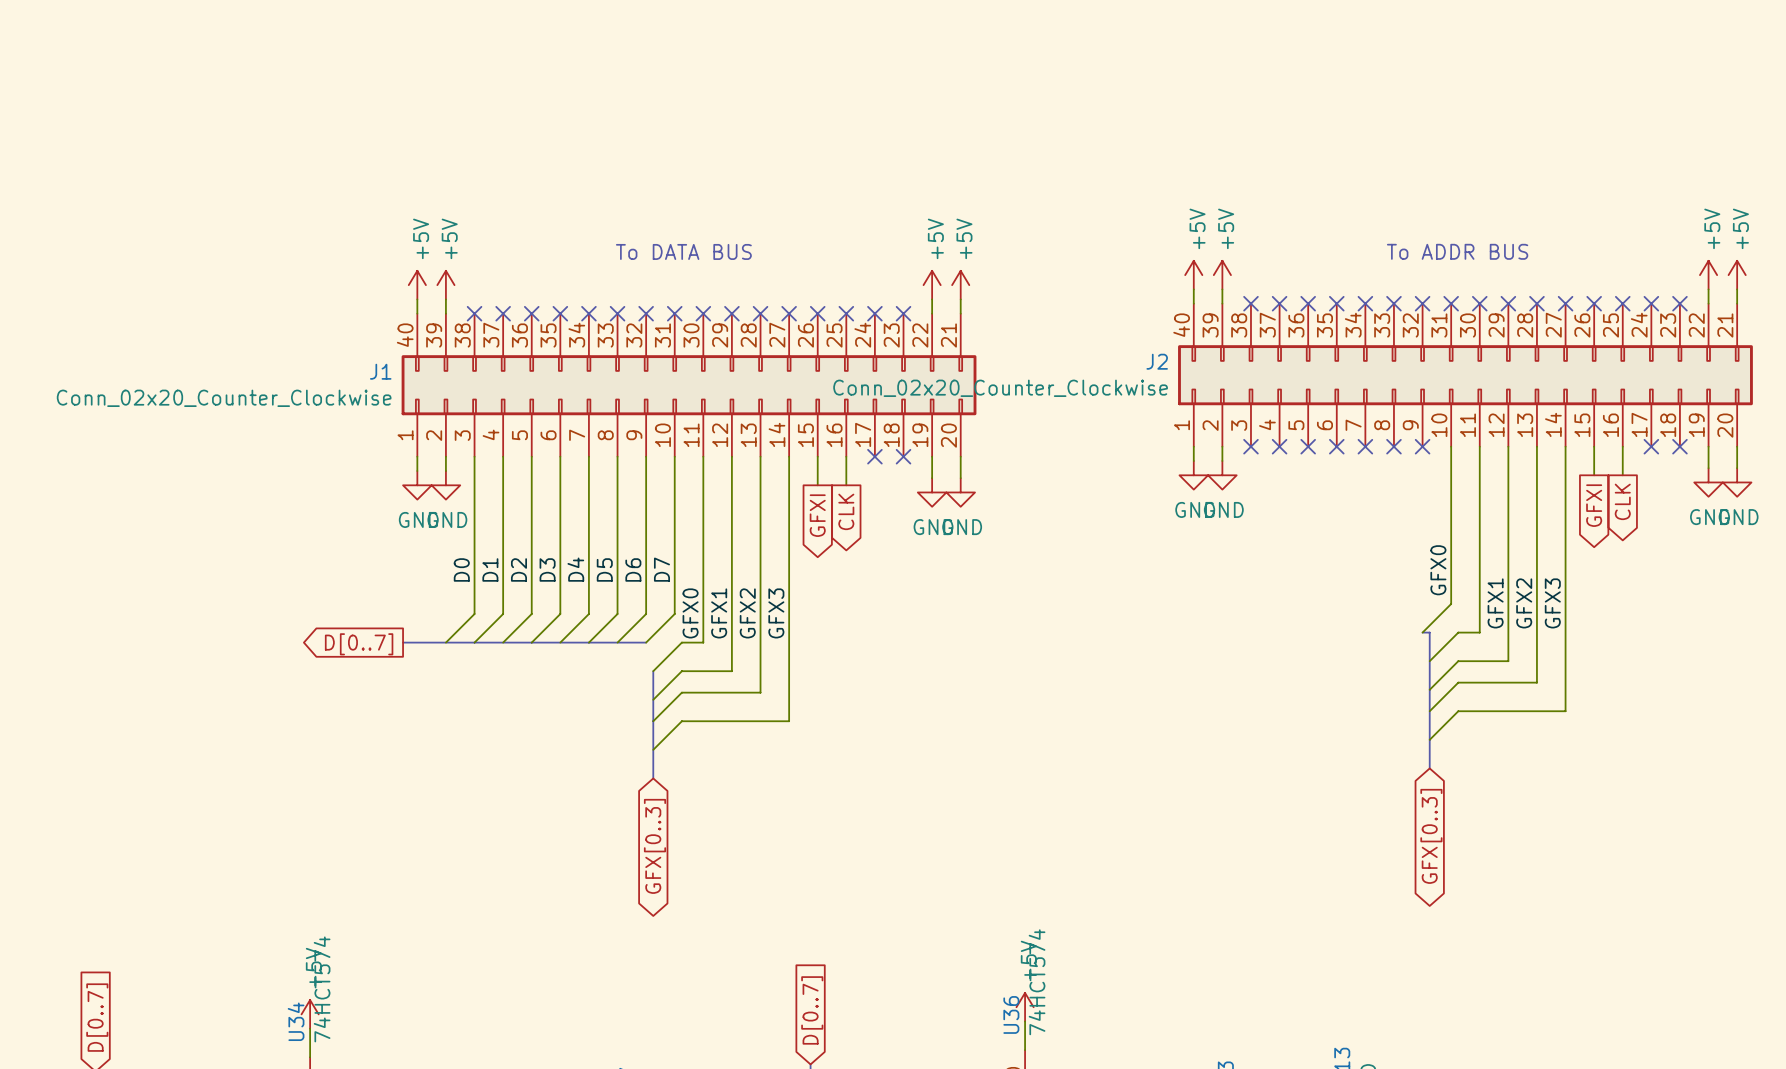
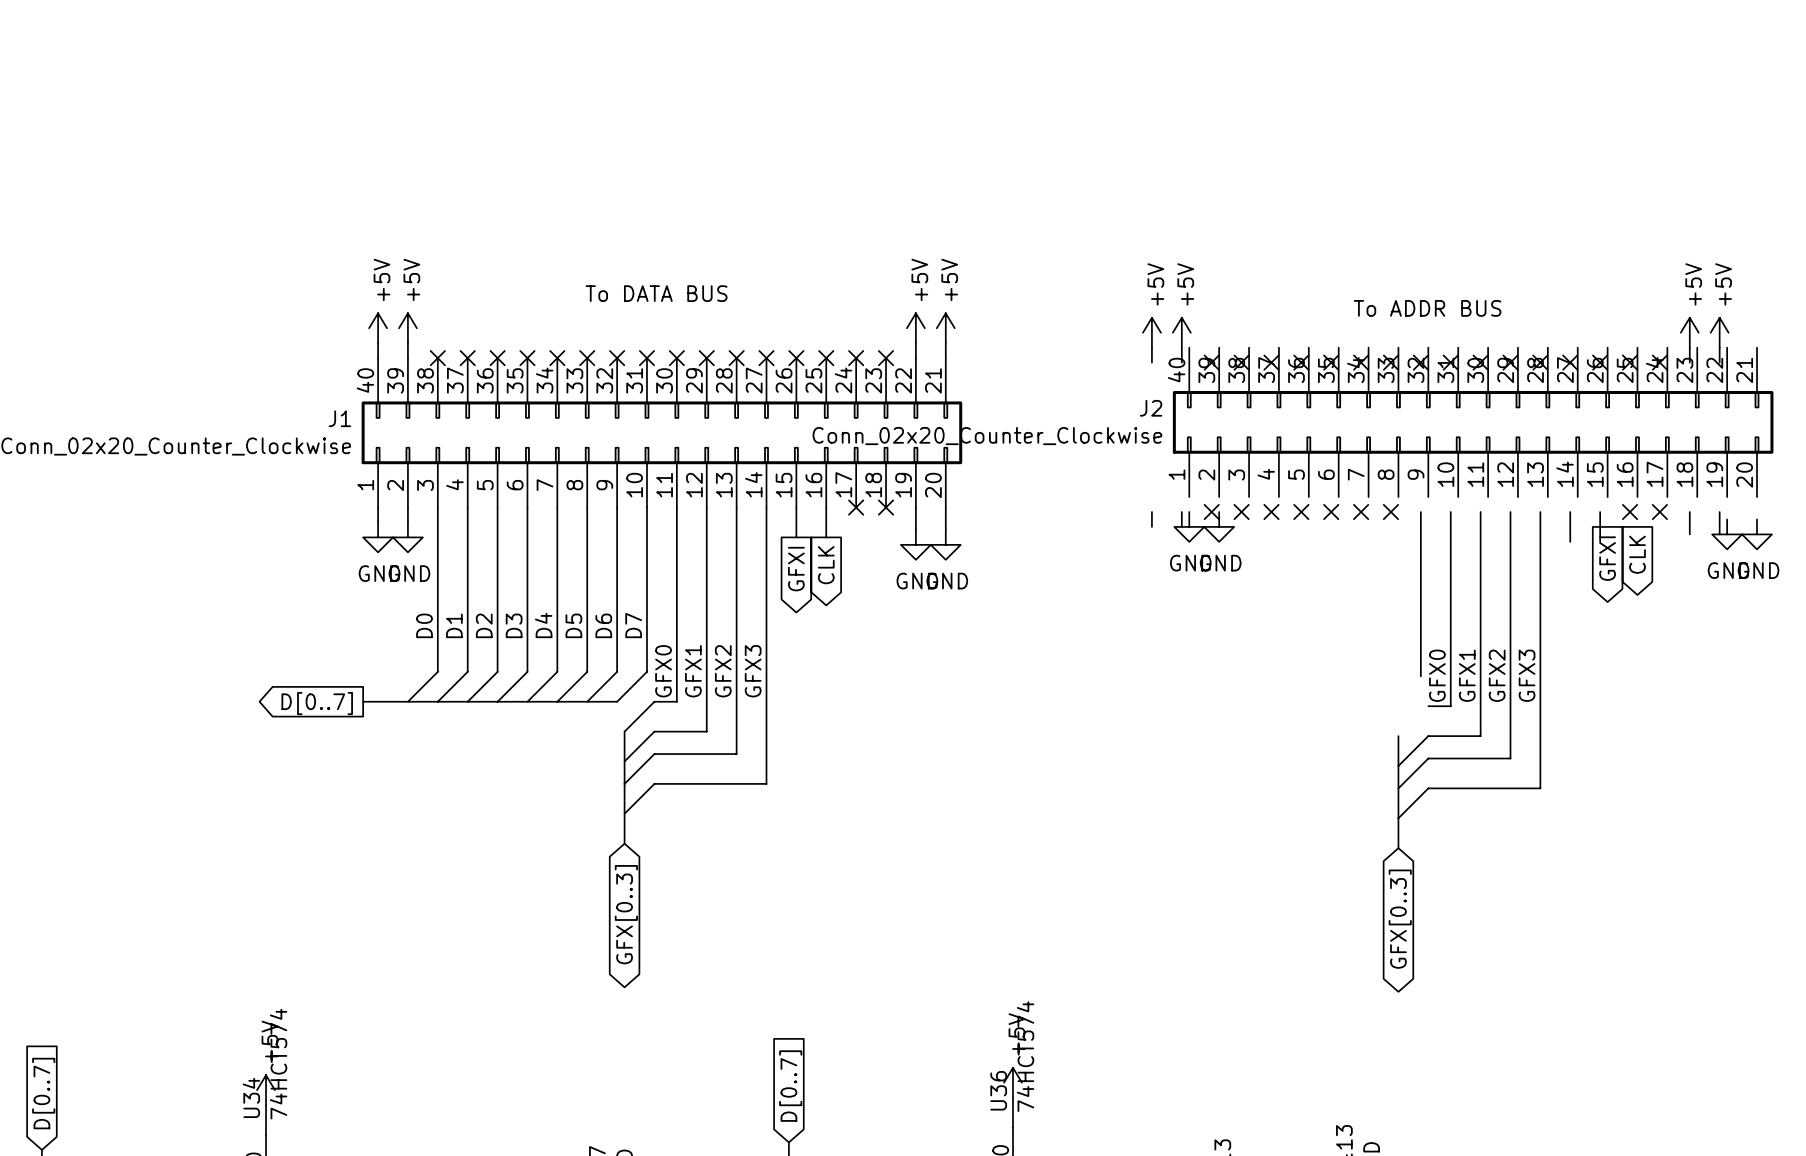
text position: To ADDR BUS (1457, 251) -> To ADDR BUS (1427, 308)
power symbol position: +5V (1193, 275) -> +5V (1181, 332)
power symbol: +5V (1222, 275) -> none
power symbol position: +5V (1708, 275) -> +5V (1719, 332)
power symbol: +5V (1737, 275) -> none
power symbol: none -> +5V (1151, 332)
wire: (1193, 289) (1193, 303) -> (1151, 347) (1151, 362)
wire: (1222, 289) (1222, 303) -> (1181, 347) (1181, 362)
power symbol: none -> +5V (1689, 332)
wire: (1708, 289) (1708, 303) -> (1689, 347) (1689, 362)
wire: (1737, 289) (1737, 303) -> (1719, 347) (1719, 362)
no-connect mark: (1250, 303) -> none
no-connect mark: (1279, 303) -> none
no-connect mark: (1308, 303) -> none
no-connect mark: (1336, 303) -> none
no-connect mark: (1365, 303) -> none
no-connect mark: (1393, 303) -> none
no-connect mark: (1422, 303) -> none
no-connect mark: (1451, 303) -> none
no-connect mark: (1479, 303) -> none
no-connect mark: (1508, 303) -> none
no-connect mark: (1536, 303) -> none
no-connect mark: (1565, 303) -> none
no-connect mark: (1594, 303) -> none
no-connect mark: (1622, 303) -> none
no-connect mark: (1651, 303) -> none
no-connect mark: (1679, 303) -> none
no-connect mark: none -> (1211, 362)
no-connect mark: none -> (1241, 362)
no-connect mark: none -> (1271, 362)
no-connect mark: none -> (1301, 362)
no-connect mark: none -> (1331, 362)
no-connect mark: none -> (1361, 362)
no-connect mark: none -> (1390, 362)
no-connect mark: none -> (1420, 362)
no-connect mark: none -> (1450, 362)
no-connect mark: none -> (1480, 362)
no-connect mark: none -> (1510, 362)
no-connect mark: none -> (1540, 362)
no-connect mark: none -> (1570, 362)
no-connect mark: none -> (1600, 362)
no-connect mark: none -> (1630, 362)
no-connect mark: none -> (1659, 362)
wire: (1193, 446) (1193, 461) -> (1151, 512) (1151, 526)
wire: (1222, 446) (1222, 461) -> (1181, 512) (1181, 526)
no-connect mark: (1250, 446) -> none
no-connect mark: (1279, 446) -> none
no-connect mark: (1308, 446) -> none
no-connect mark: (1336, 446) -> none
no-connect mark: (1365, 446) -> none
no-connect mark: (1393, 446) -> none
no-connect mark: (1422, 446) -> none
wire: (1451, 446) (1451, 603) (1422, 632) -> none
wire: (1479, 446) (1479, 632) (1458, 632) (1429, 661) -> none
wire: (1508, 446) (1508, 661) (1458, 661) (1429, 689) -> (1480, 512) (1480, 736) (1428, 736) (1398, 765)
wire: (1536, 446) (1536, 682) (1458, 682) (1429, 711) -> (1510, 512) (1510, 758) (1428, 758) (1398, 788)
wire: (1565, 446) (1565, 711) (1458, 711) (1429, 739) -> (1540, 512) (1540, 788) (1428, 788) (1398, 818)
wire: (1594, 446) (1594, 475) -> (1570, 512) (1570, 541)
wire: (1622, 446) (1622, 475) -> (1600, 512) (1600, 541)
no-connect mark position: (1651, 446) -> (1659, 512)
no-connect mark: (1679, 446) -> none
wire: (1708, 446) (1708, 468) -> (1689, 512) (1689, 534)
wire: (1737, 446) (1737, 468) -> (1719, 512) (1719, 534)
no-connect mark: none -> (1211, 512)
no-connect mark: none -> (1241, 512)
no-connect mark: none -> (1271, 512)
no-connect mark: none -> (1301, 512)
no-connect mark: none -> (1331, 512)
no-connect mark: none -> (1361, 512)
no-connect mark: none -> (1390, 512)
wire: none -> (1420, 512) (1420, 676)
wire: none -> (1450, 512) (1450, 706) (1428, 706)
no-connect mark: none -> (1630, 512)
label position: GFX0 (1438, 570) -> GFX0 (1437, 675)
label position: GFX1 (1495, 603) -> GFX1 (1467, 675)
label position: GFX2 (1524, 603) -> GFX2 (1497, 675)
label position: GFX3 (1552, 603) -> GFX3 (1527, 675)
bus: (1422, 632) (1429, 632) (1429, 768) -> none
bus: none -> (1398, 736) (1398, 848)
global label position: GFX[0..3] (1431, 836) -> GFX[0..3] (1400, 919)

